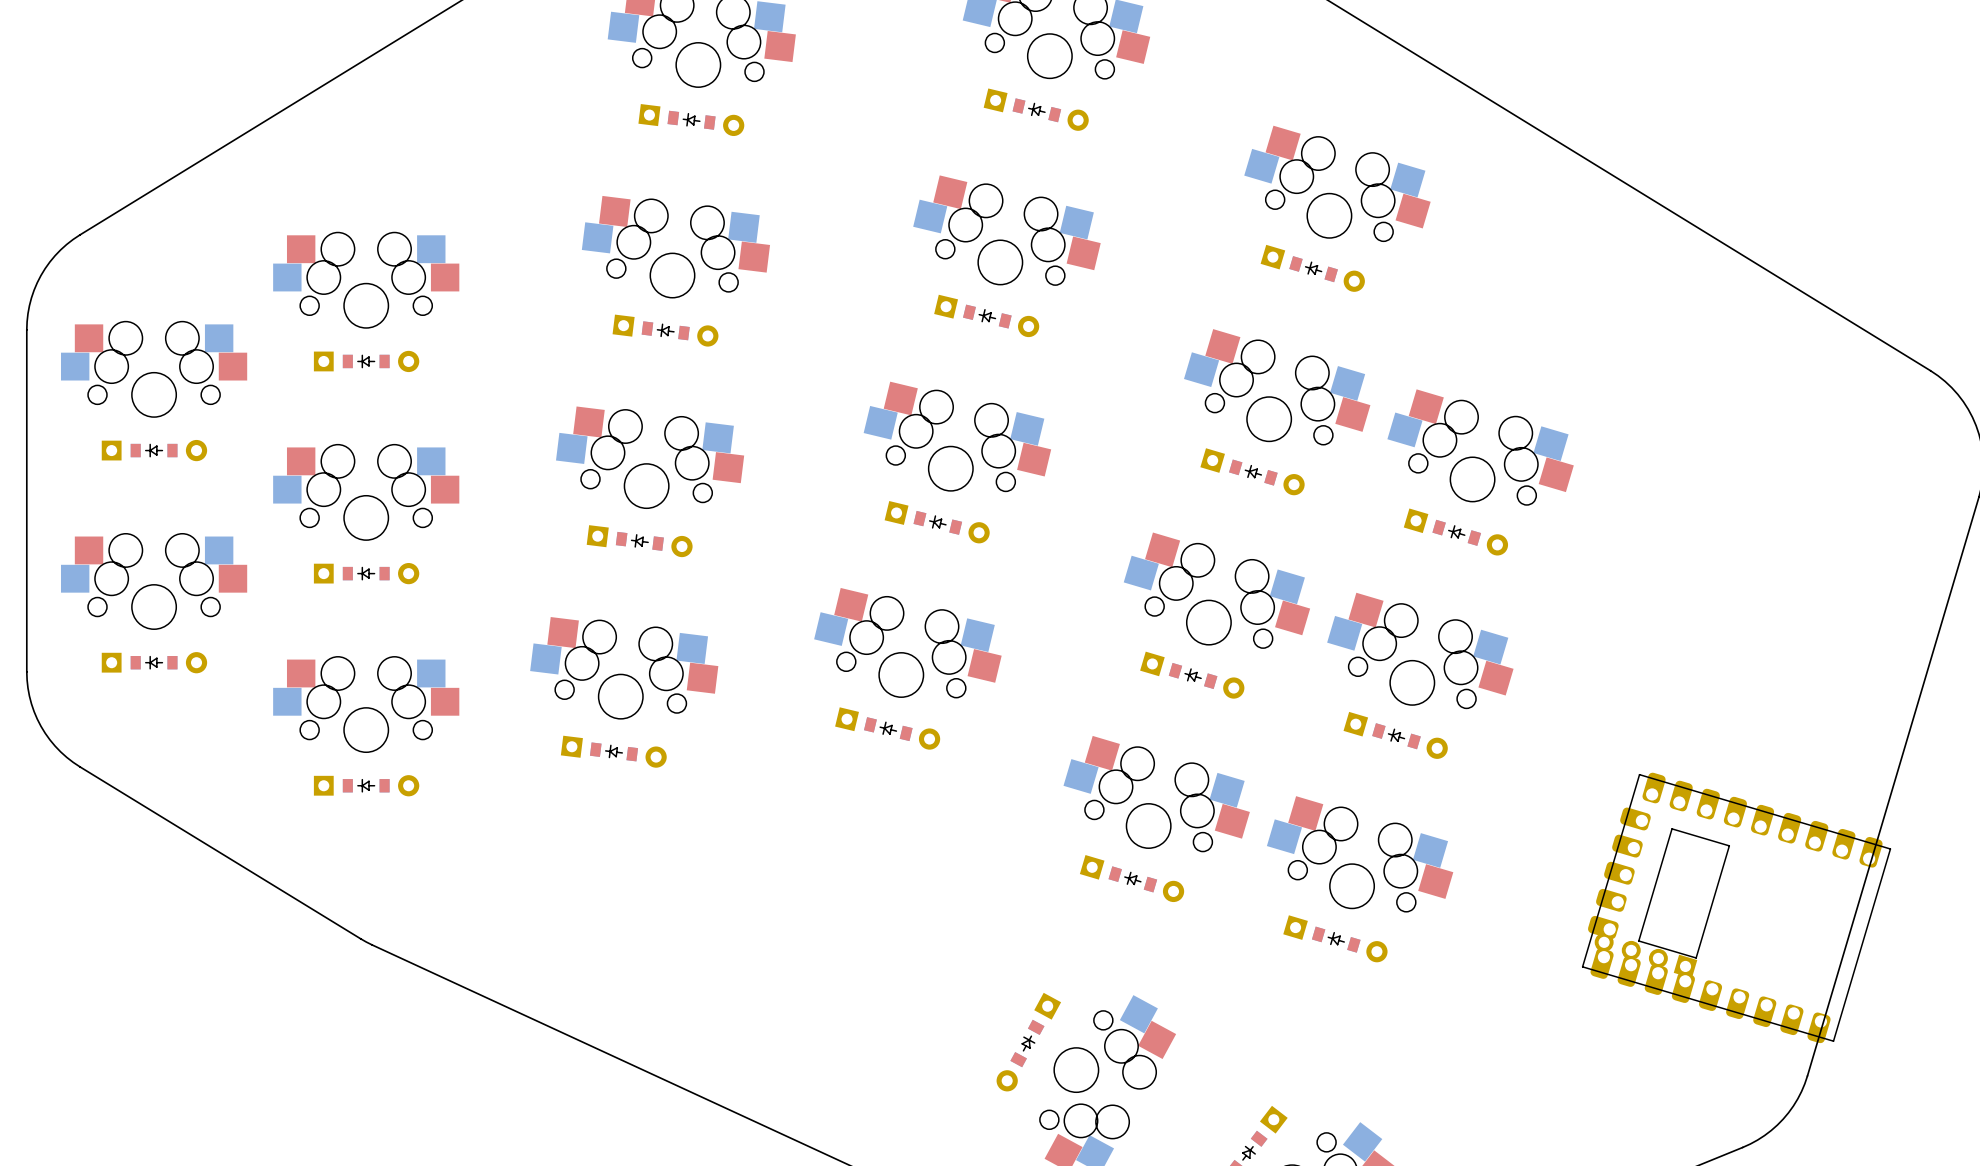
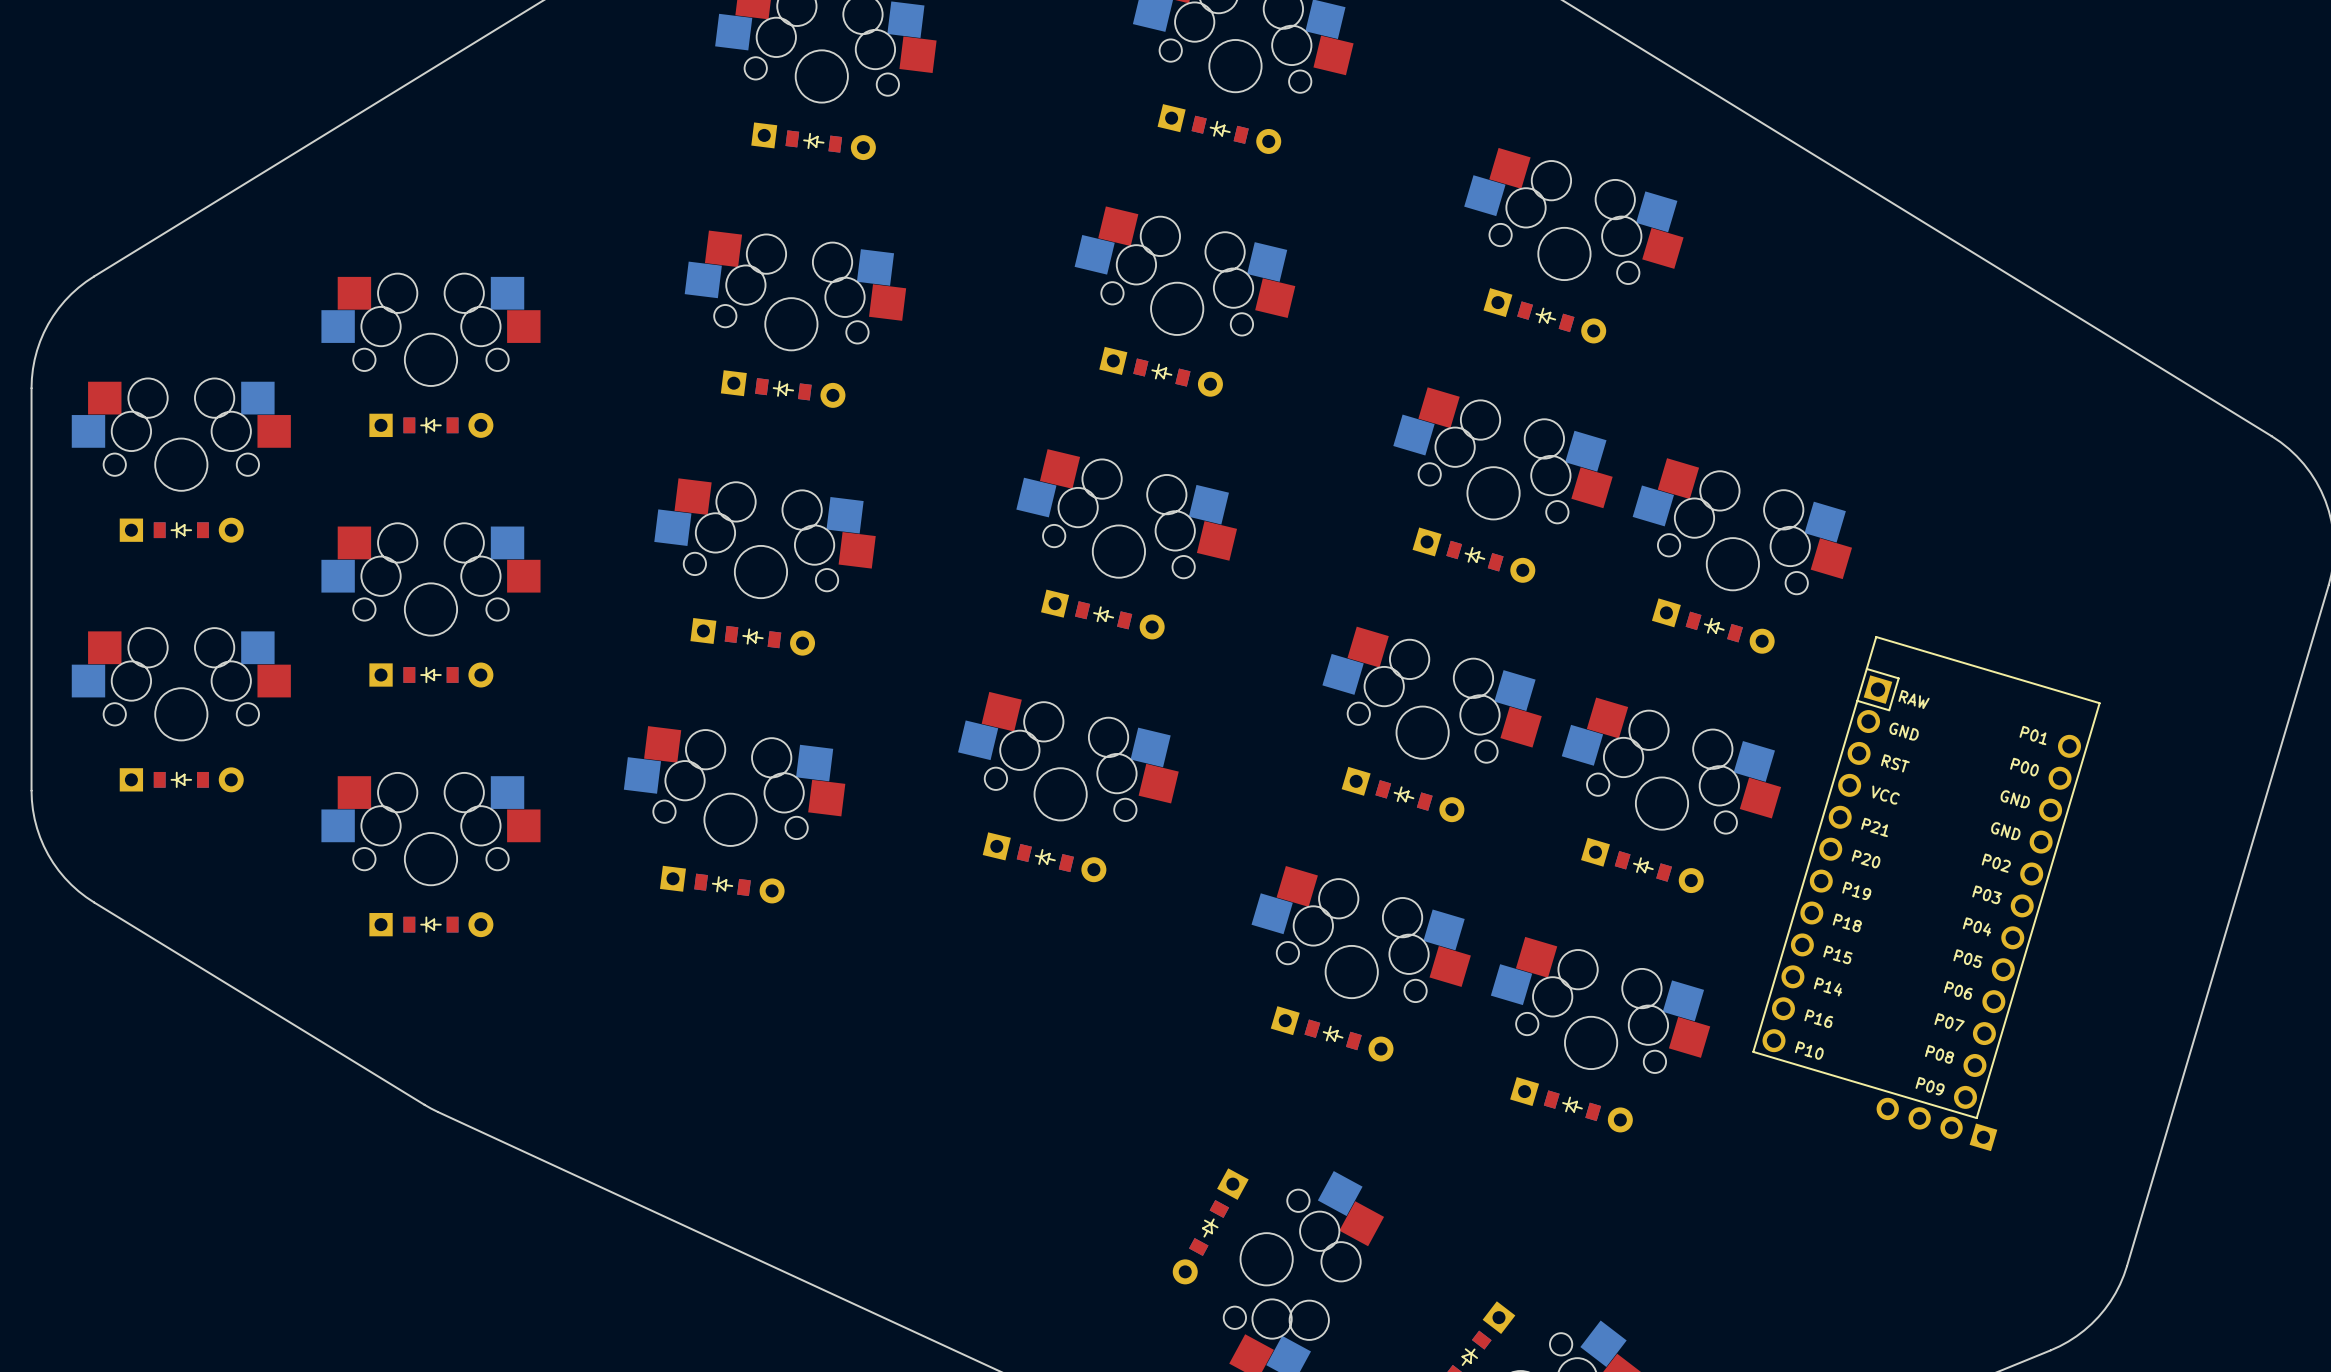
part: none -> (1926, 877)
part: (1736, 907) -> none

